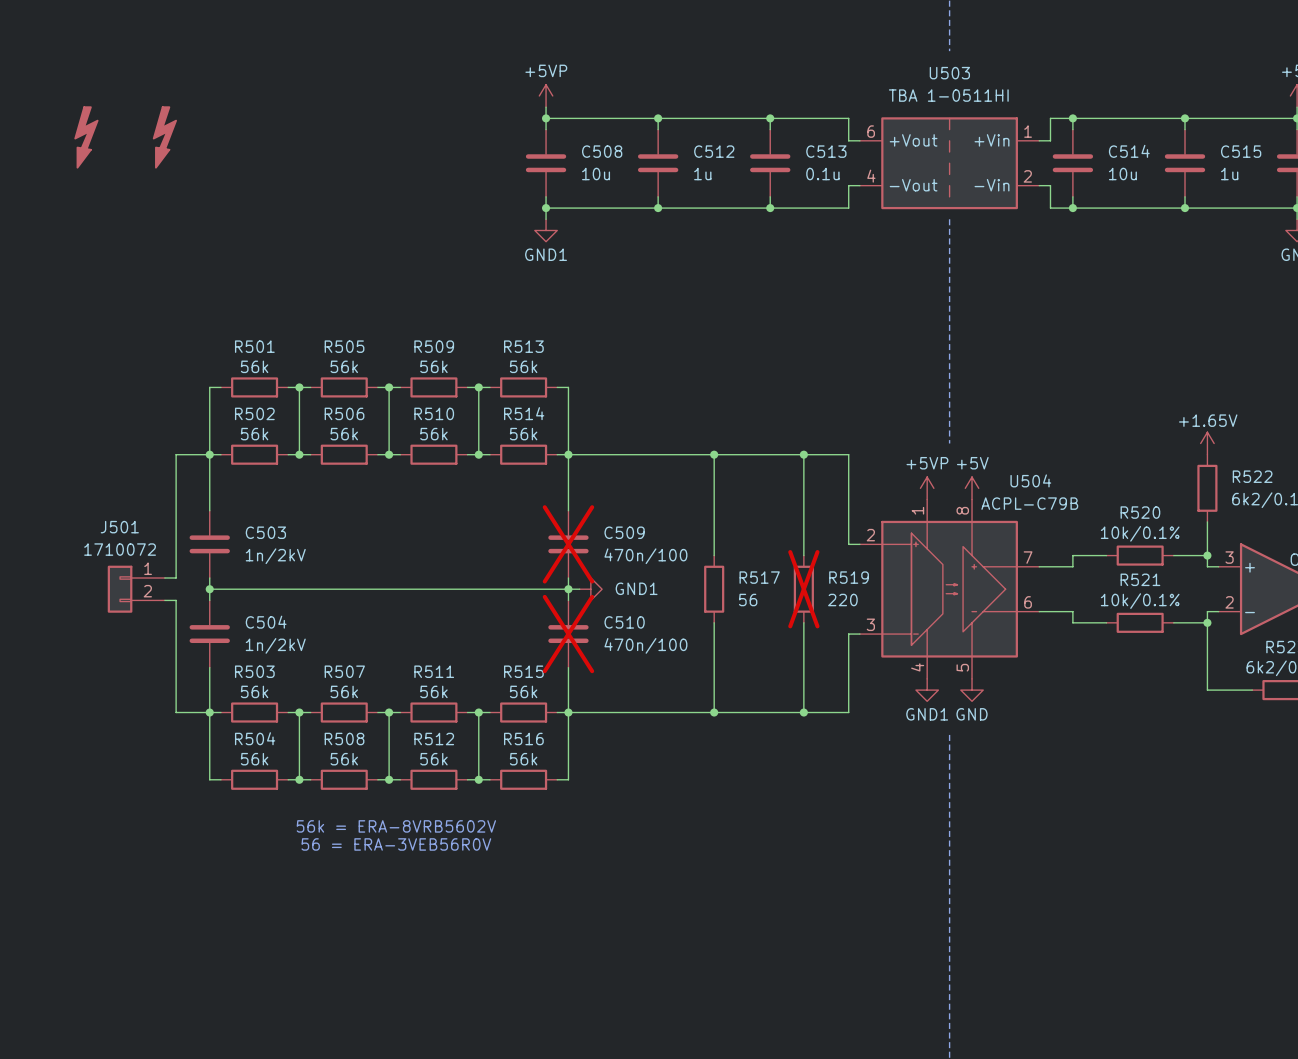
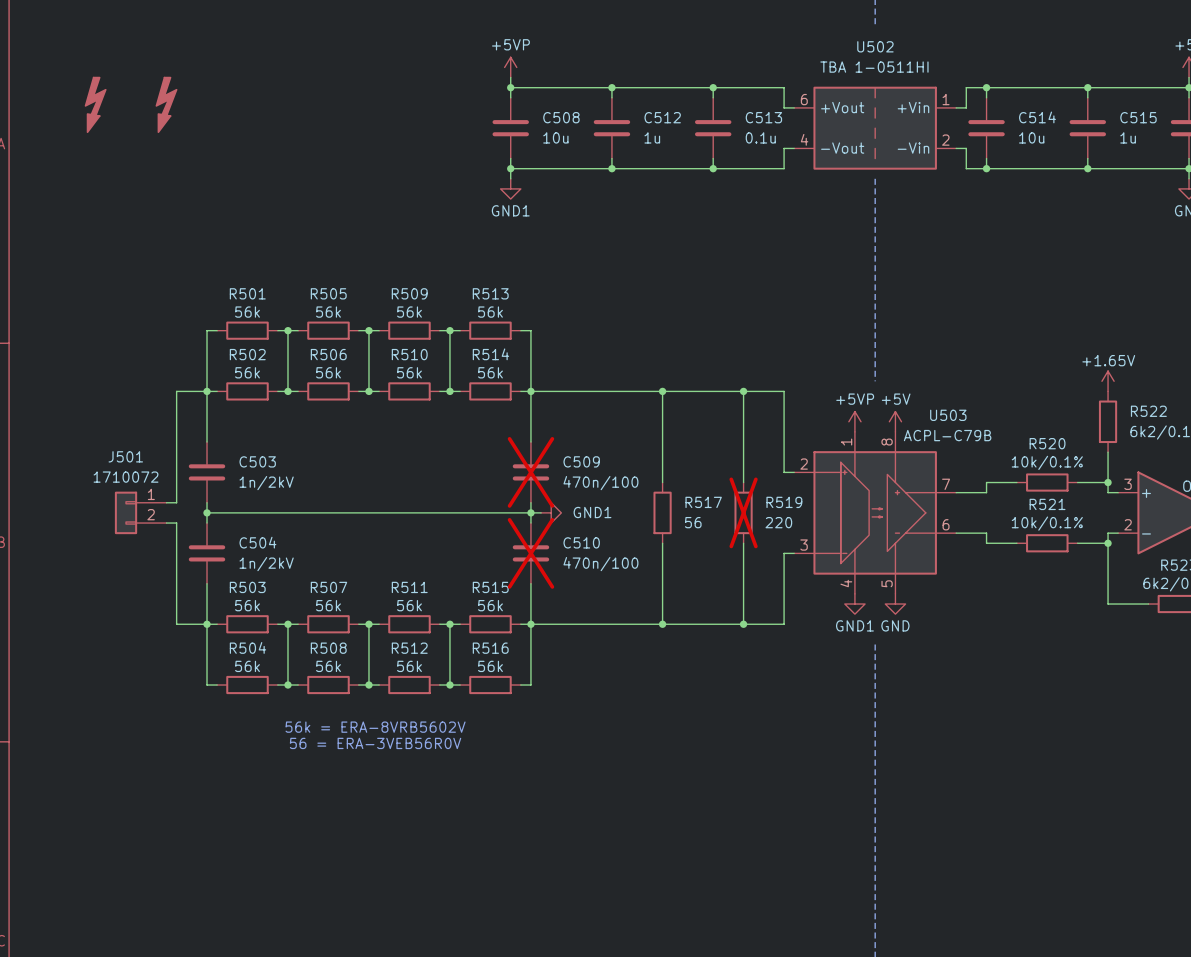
U503 name: U503 (949, 73) -> U502 (875, 46)
U504 name: U504 (1030, 480) -> U503 (948, 415)

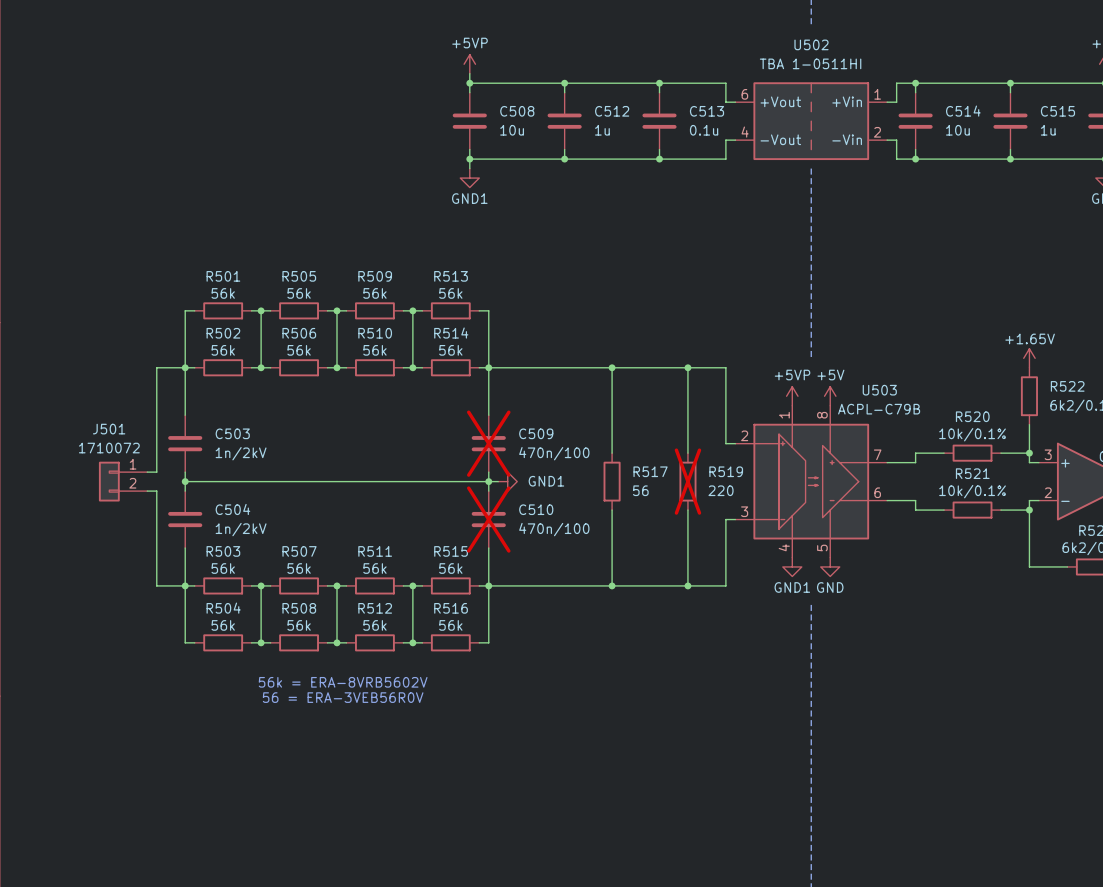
part: (95, 104) -> none
part: (166, 104) -> none

